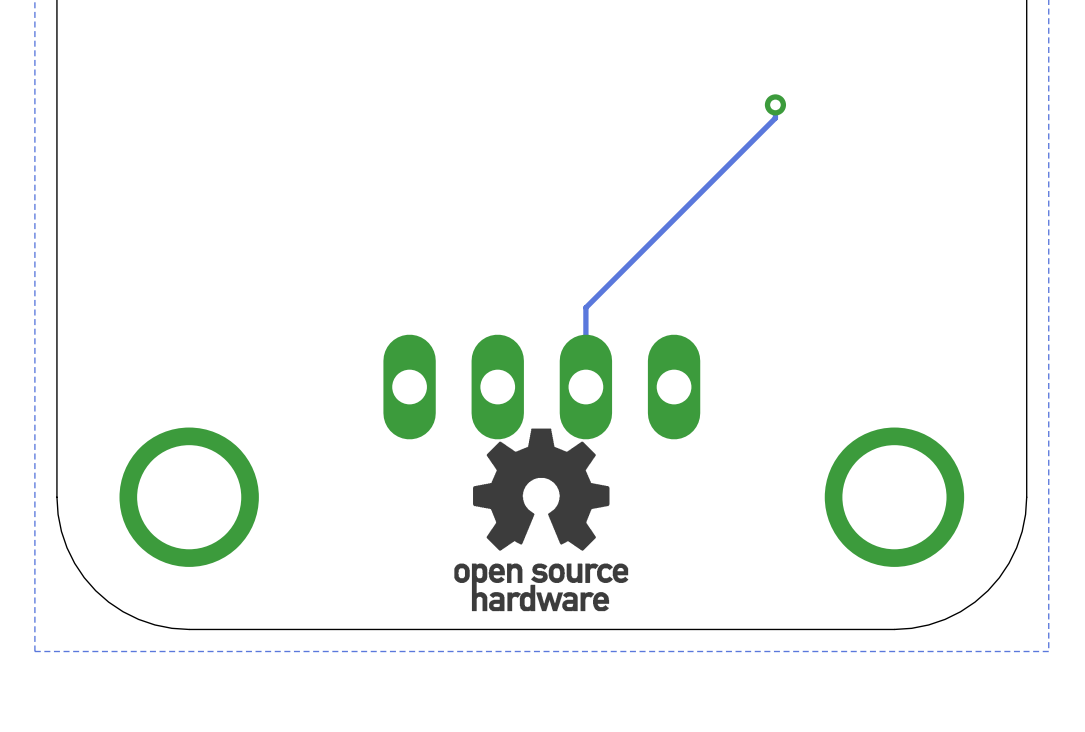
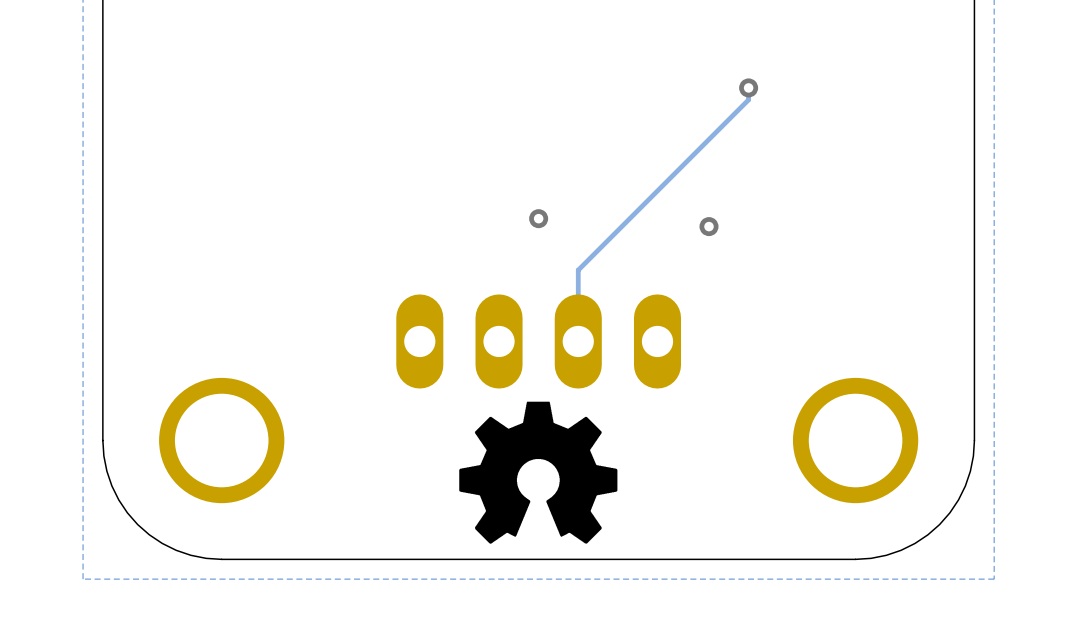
via: none -> (538, 218)
via: none -> (709, 226)
drawing shape: [454, 428, 629, 612] -> [459, 401, 618, 544]

